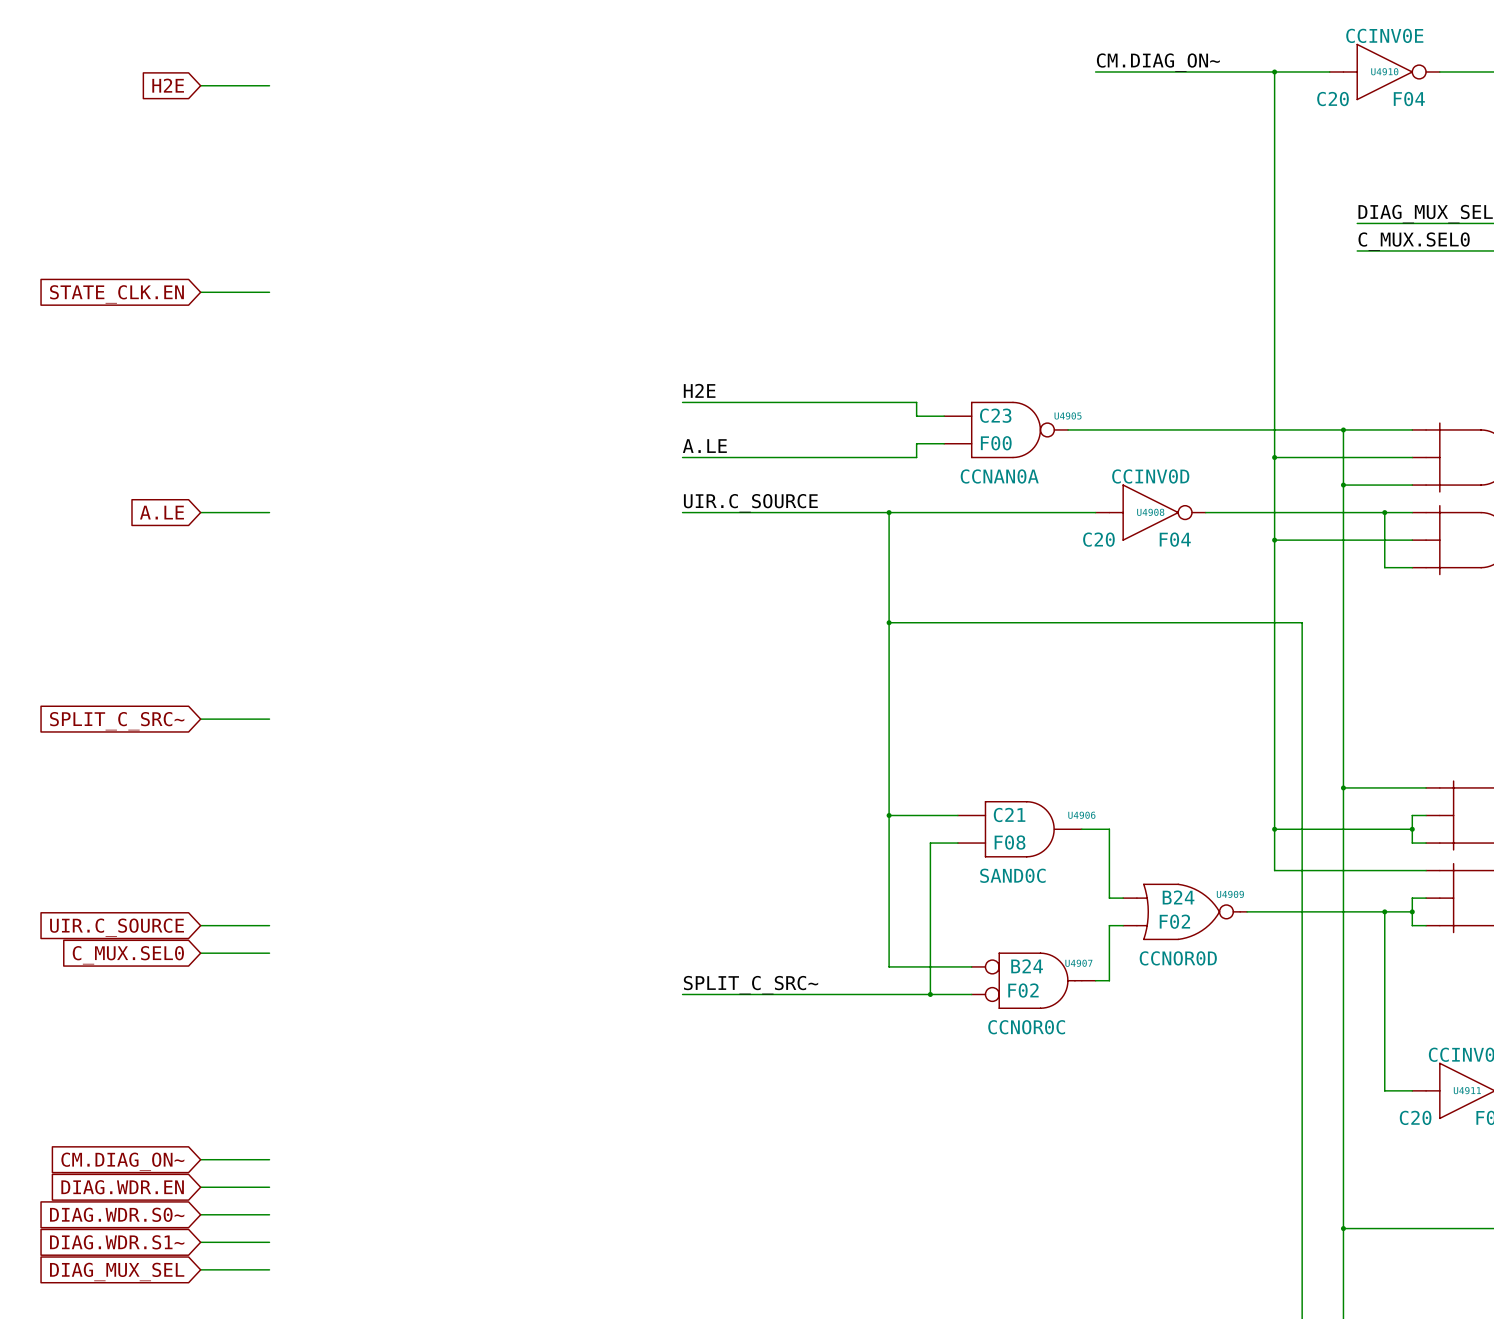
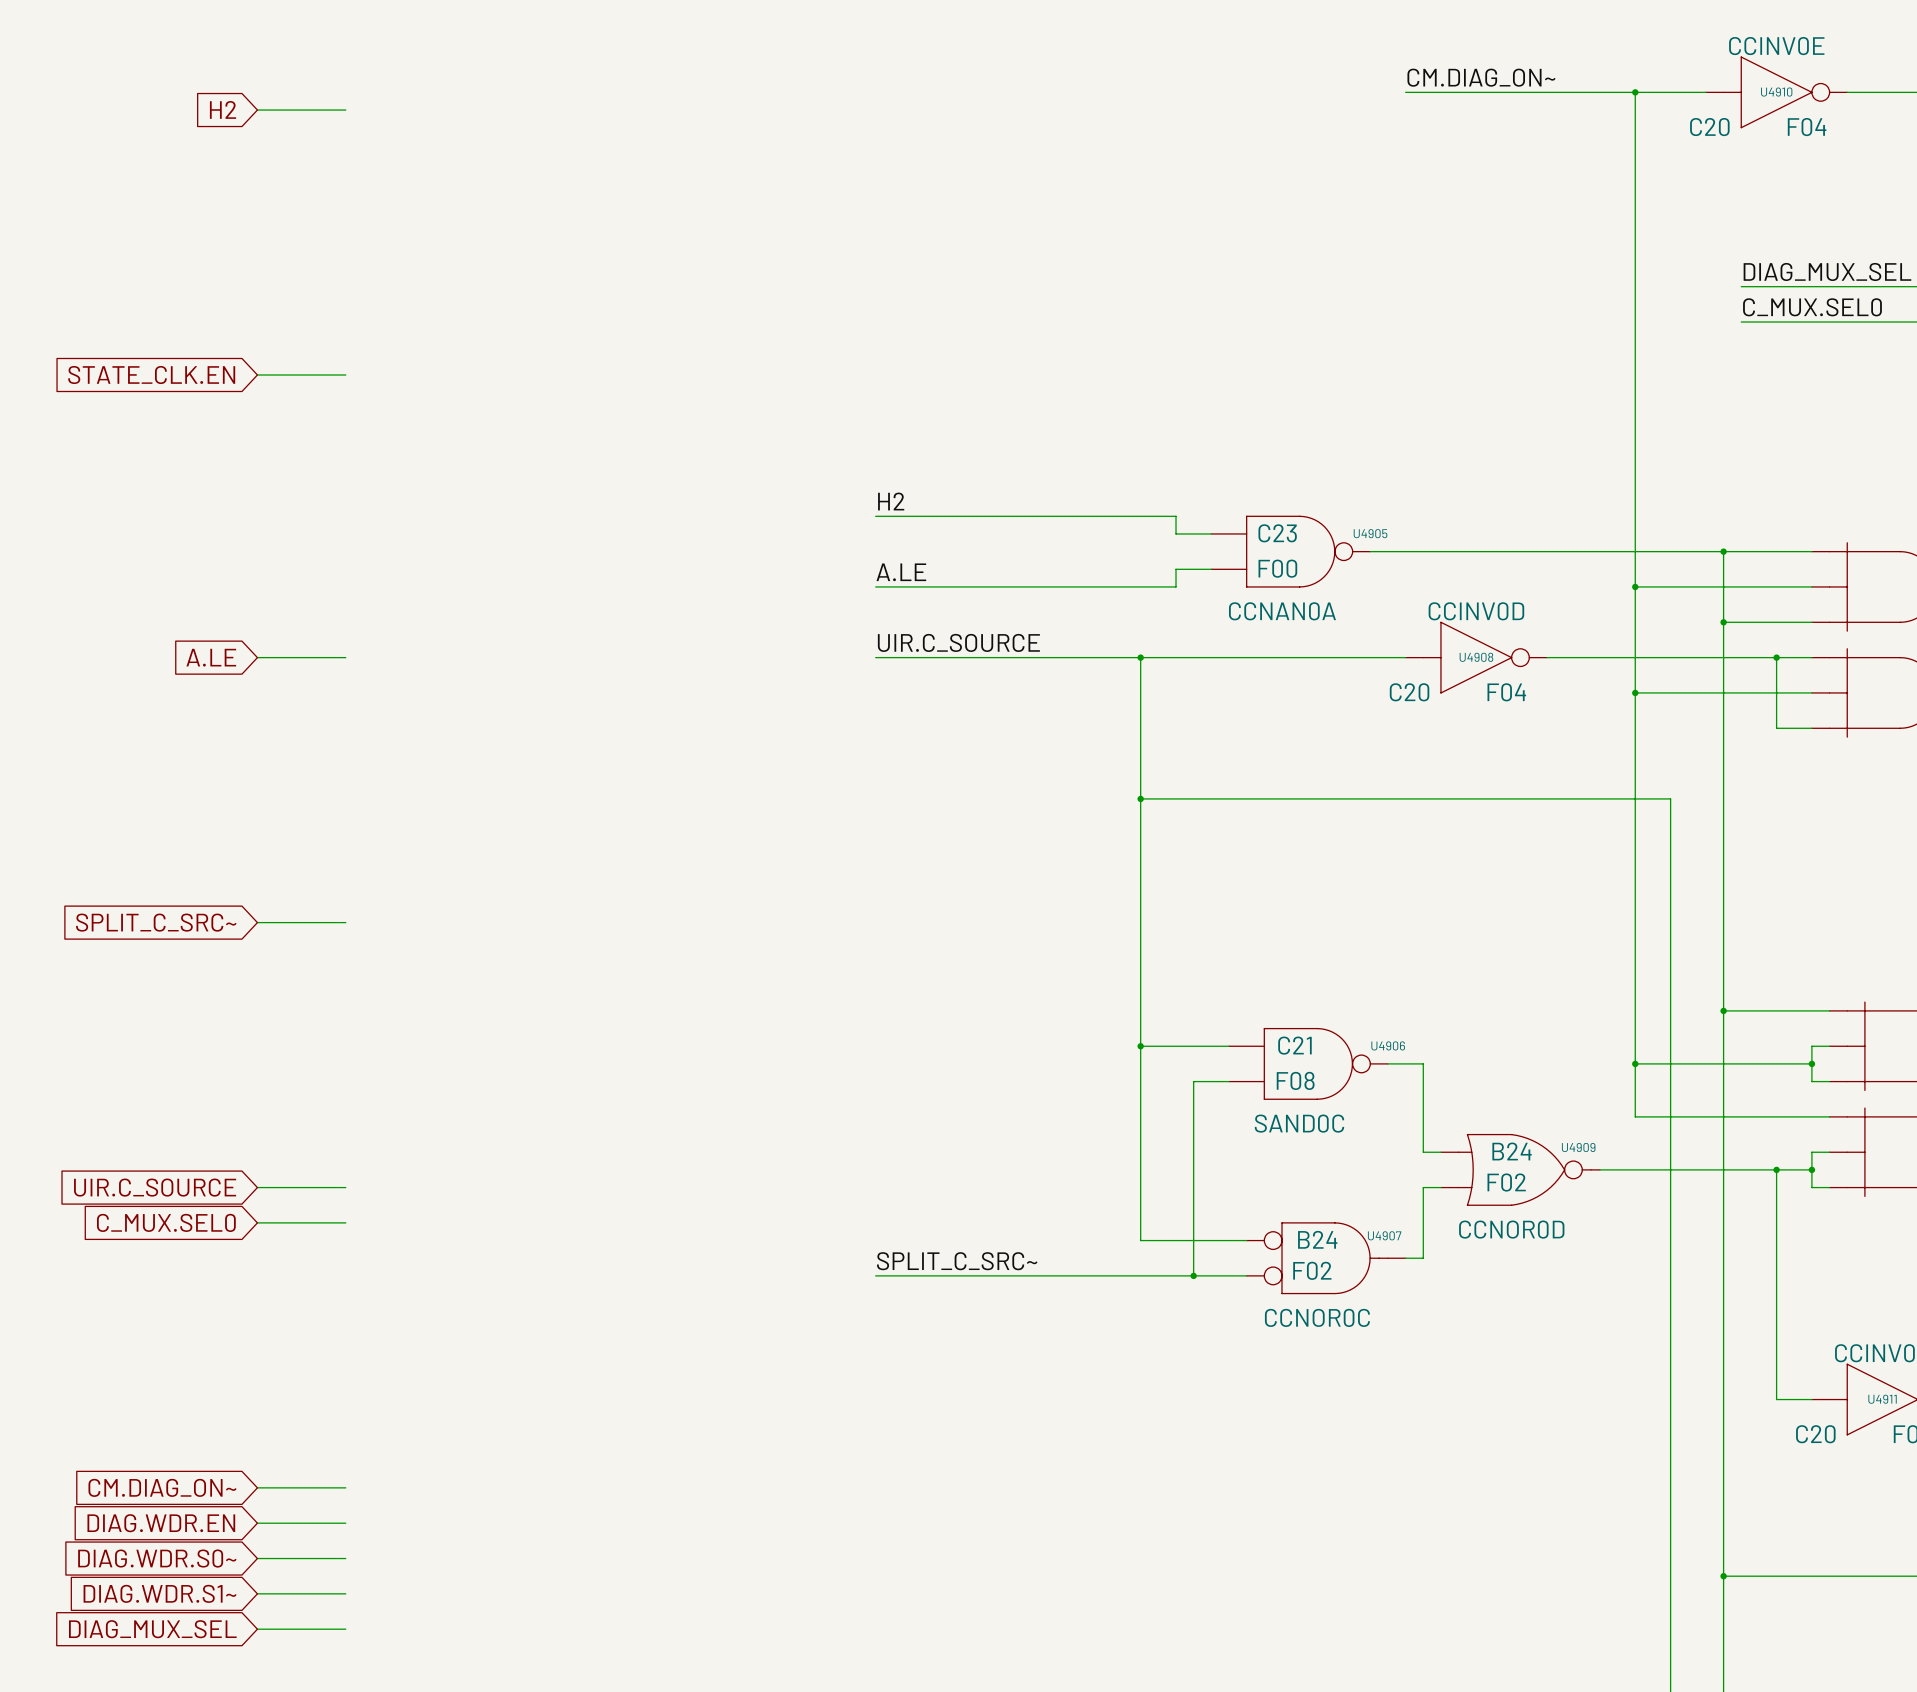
global label: H2E (168, 85) -> H2 (223, 109)
label: H2E (699, 390) -> H2 (891, 501)
U4906 symbol: [957, 801, 1082, 858] -> [1228, 1028, 1388, 1100]

